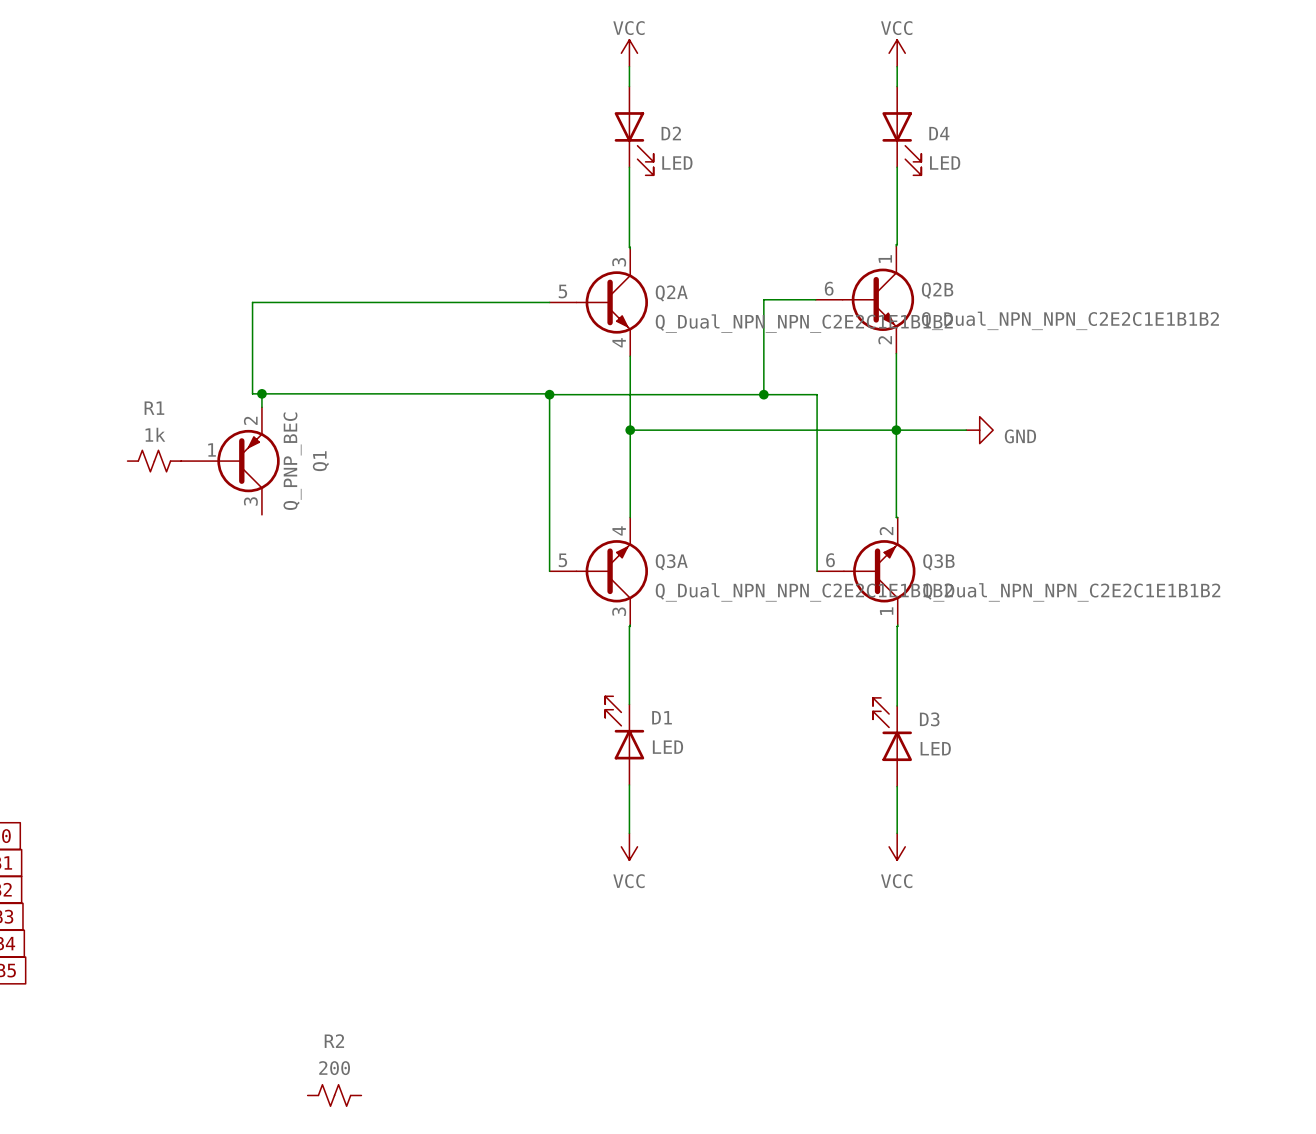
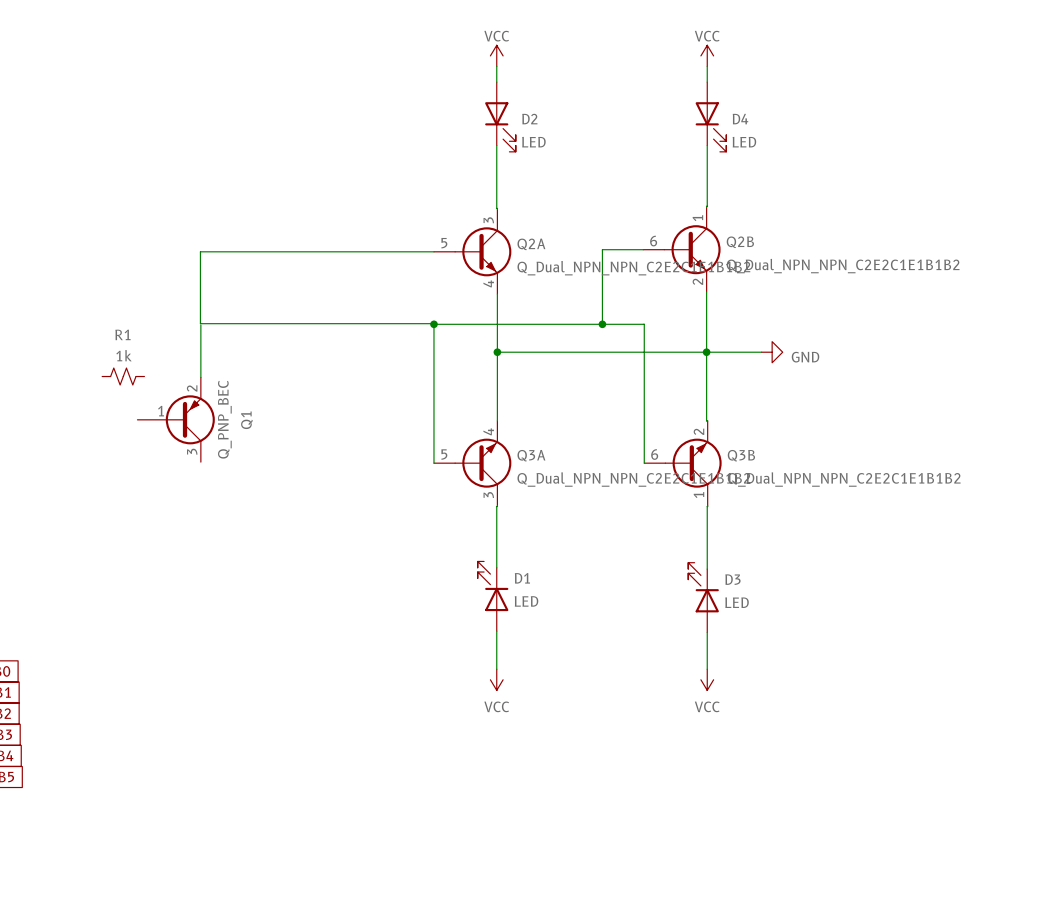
wire: (261, 393) (261, 407) -> none
junction: (261, 393) -> none
wire: none -> (200, 325) (200, 377)
Q1 position: (230, 461) -> (176, 419)
R2: 200 (334, 1095) -> none

